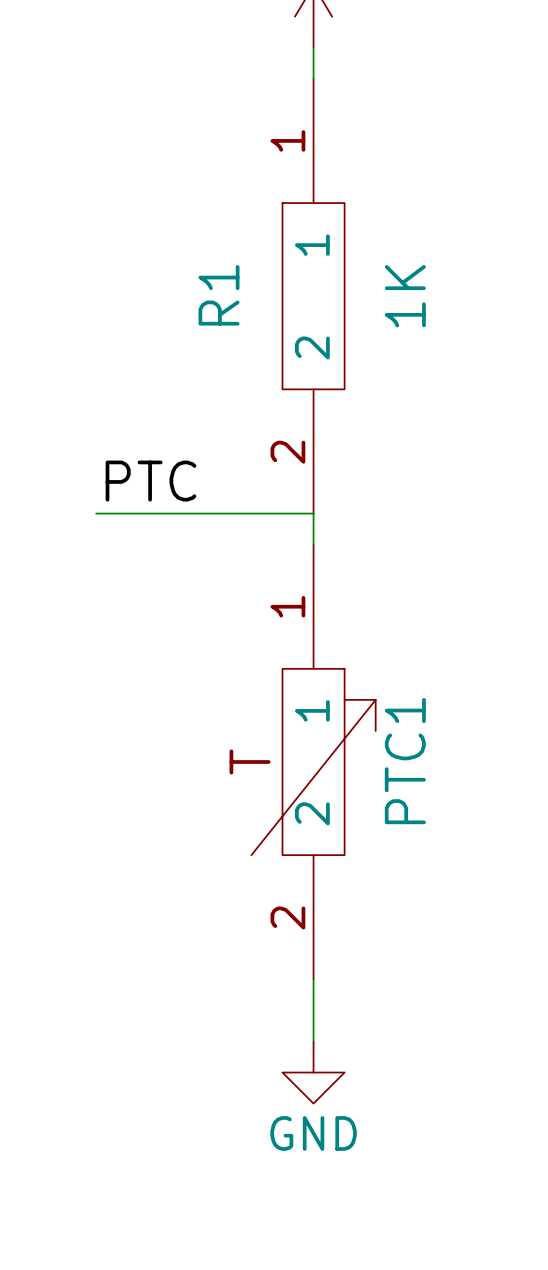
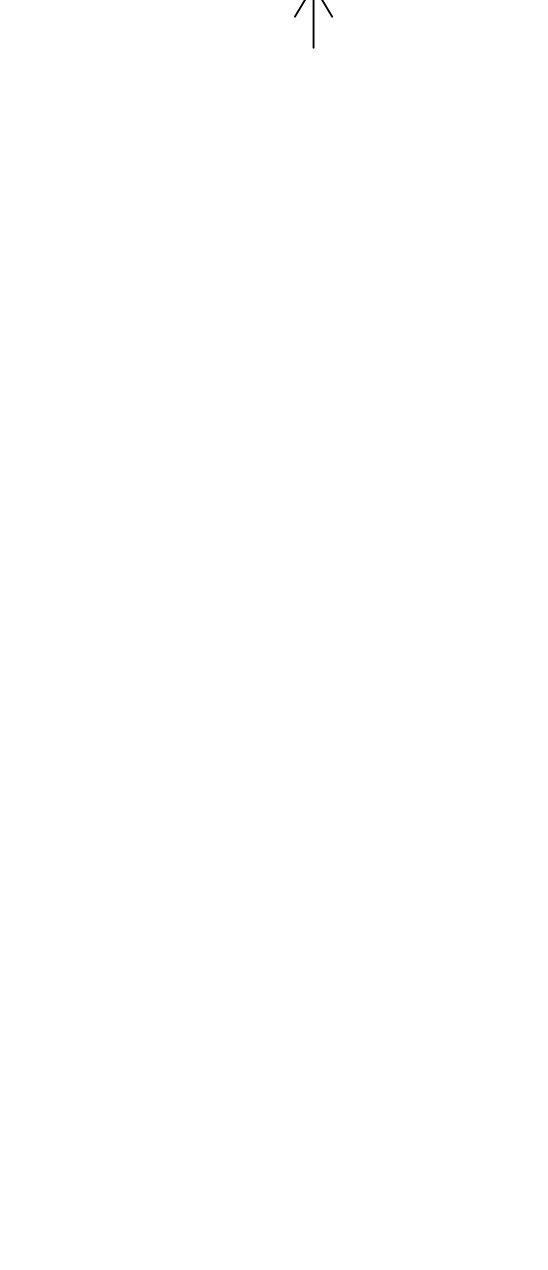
wire: (313, 47) (313, 78) -> none
R1: 1K (313, 296) -> none
label: PTC (150, 481) -> none
wire: (96, 513) (313, 513) (313, 544) -> none
PTC1: (313, 761) -> none
wire: (313, 979) (313, 1041) -> none
power symbol: GND (313, 1072) -> none

